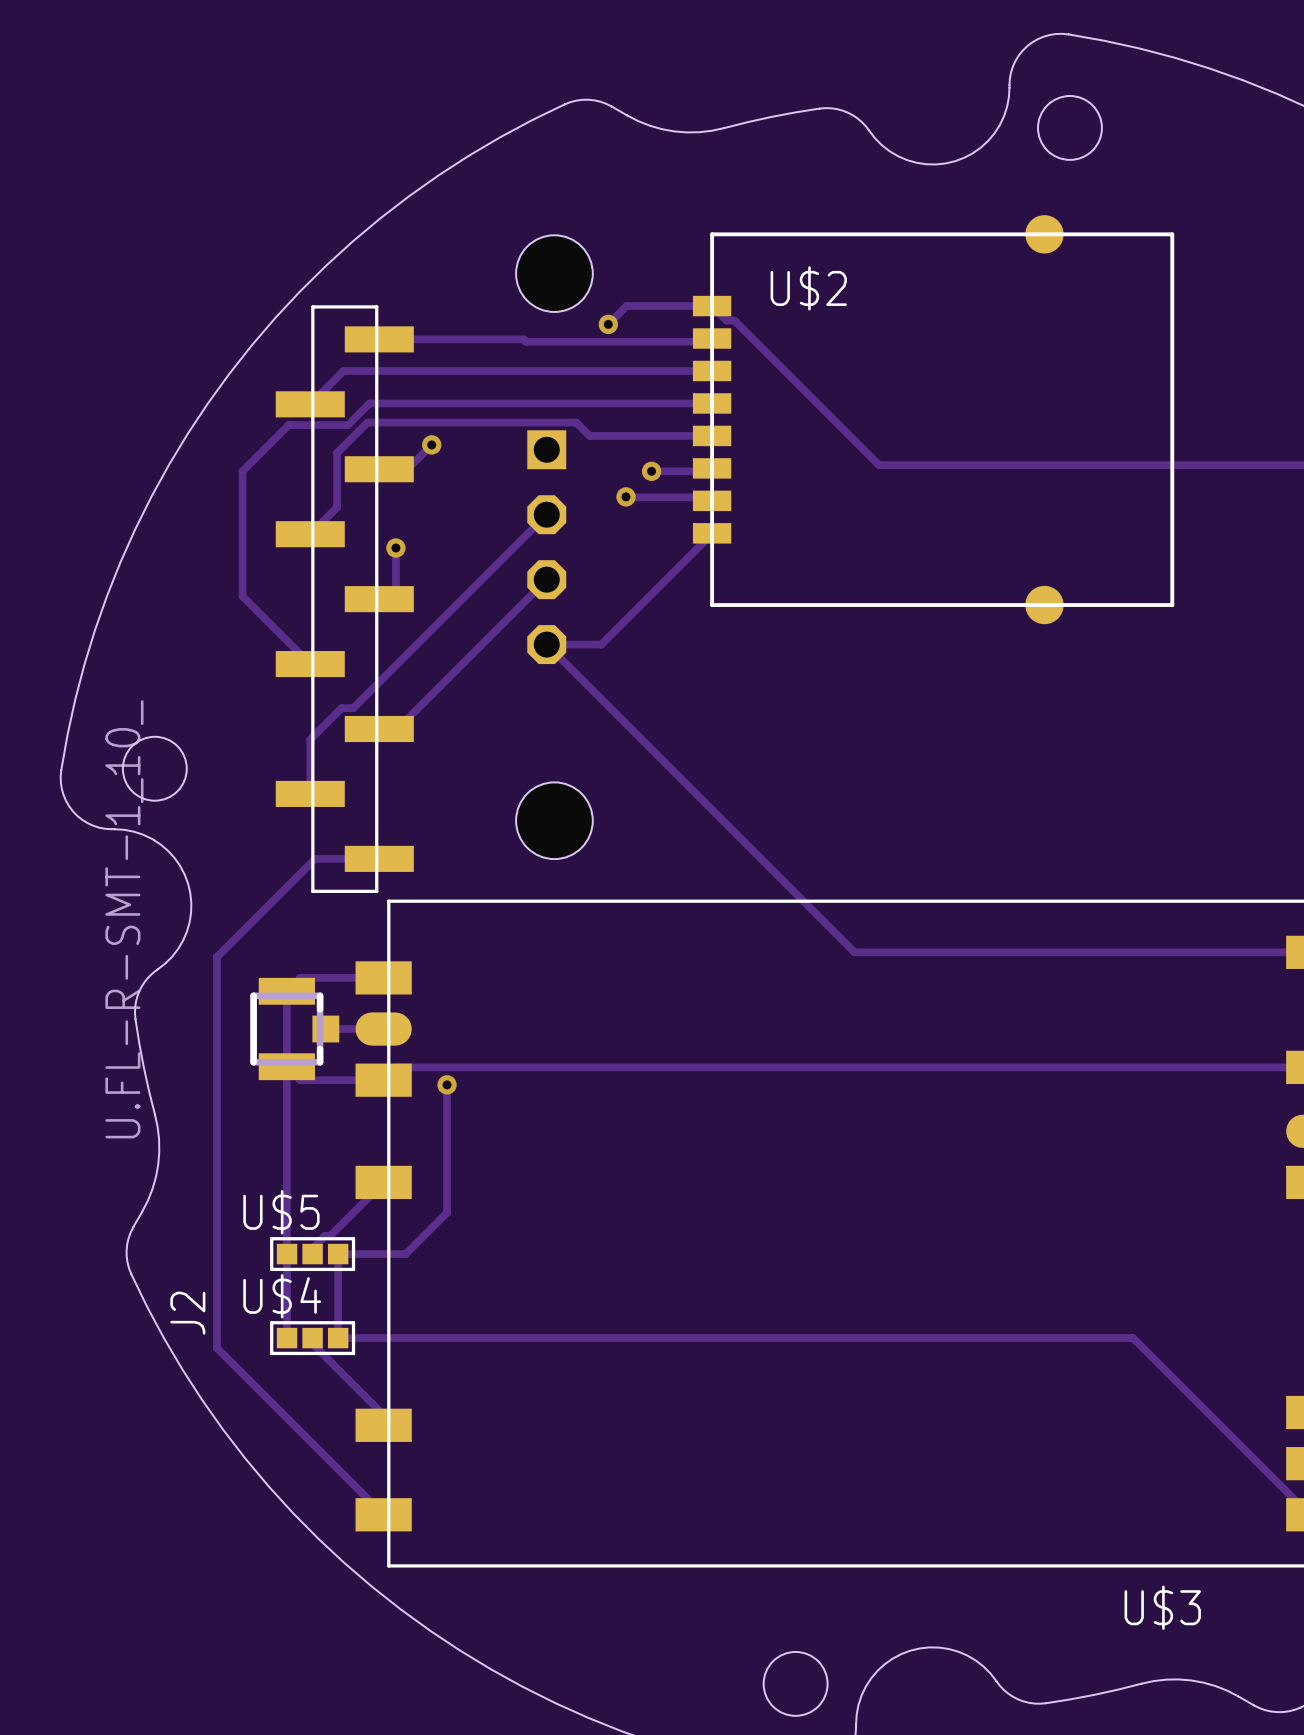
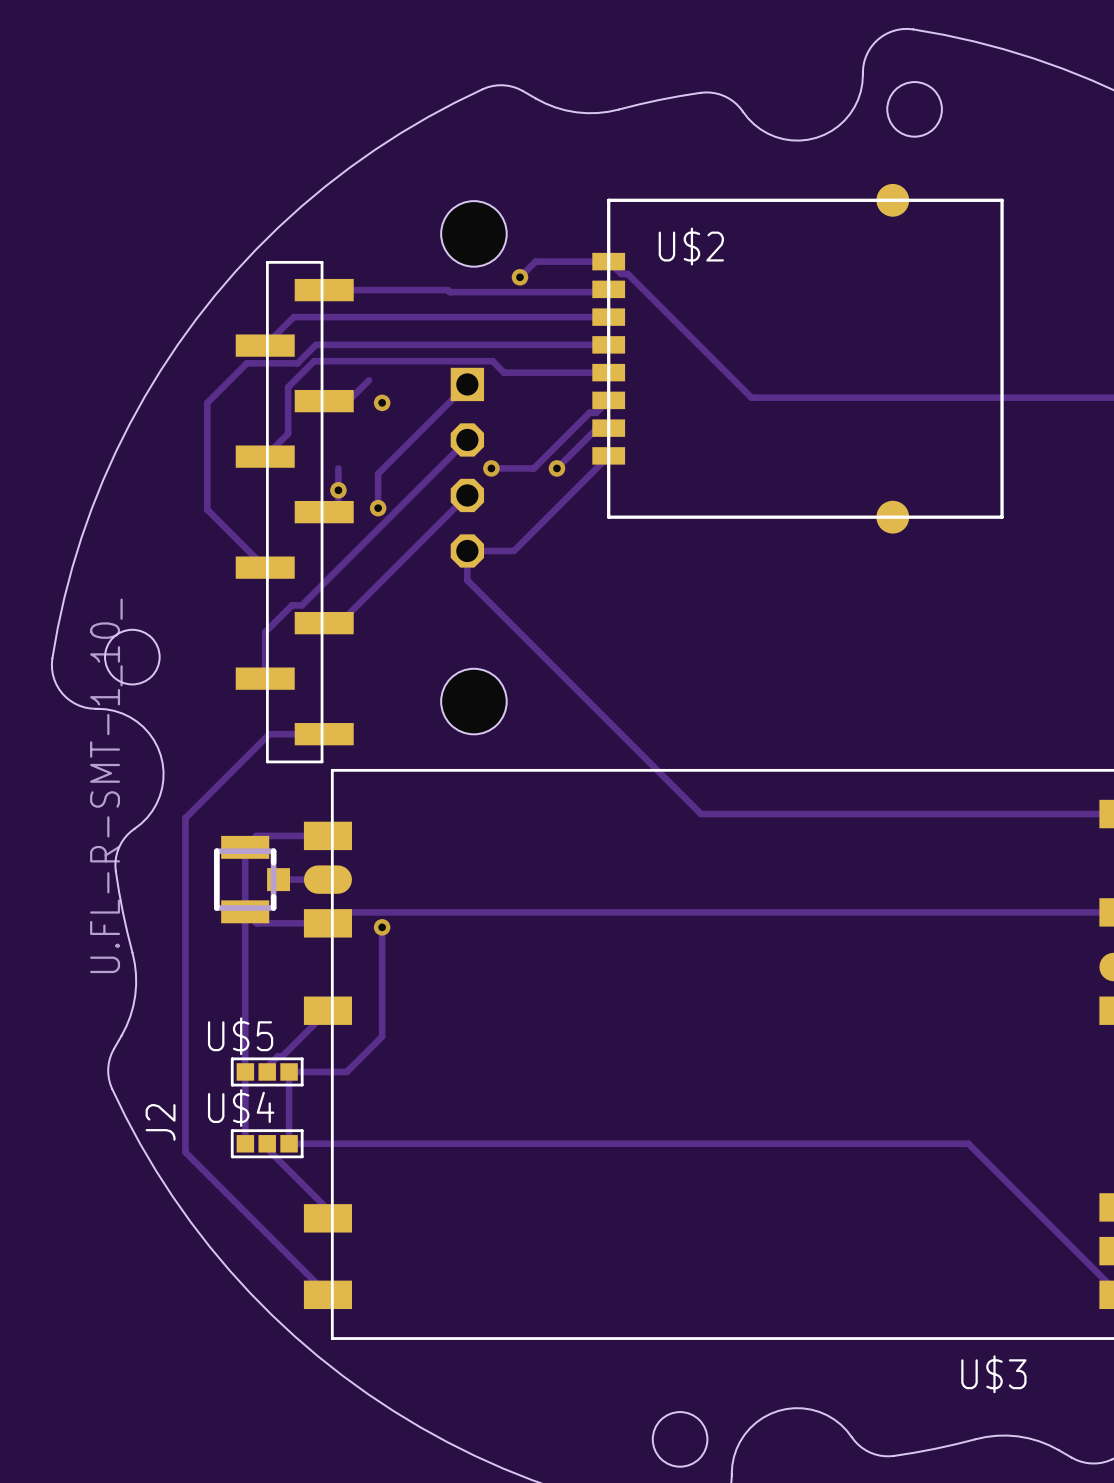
via position: (431, 444) -> (382, 402)
track: none -> (467, 384) (378, 473) (378, 508)
track: (651, 471) (709, 471) -> (491, 468) (533, 468) (589, 412) (596, 412) (606, 402)
via: (651, 471) -> none
track: (626, 496) (708, 497) (712, 500) -> (556, 468) (597, 428) (608, 428)
via: (626, 496) -> none
via position: (395, 548) -> (338, 490)
via: none -> (491, 468)
via: none -> (556, 468)
via: none -> (378, 508)
track: (546, 644) (854, 952) -> (467, 550) (467, 580) (701, 814) (730, 814)

